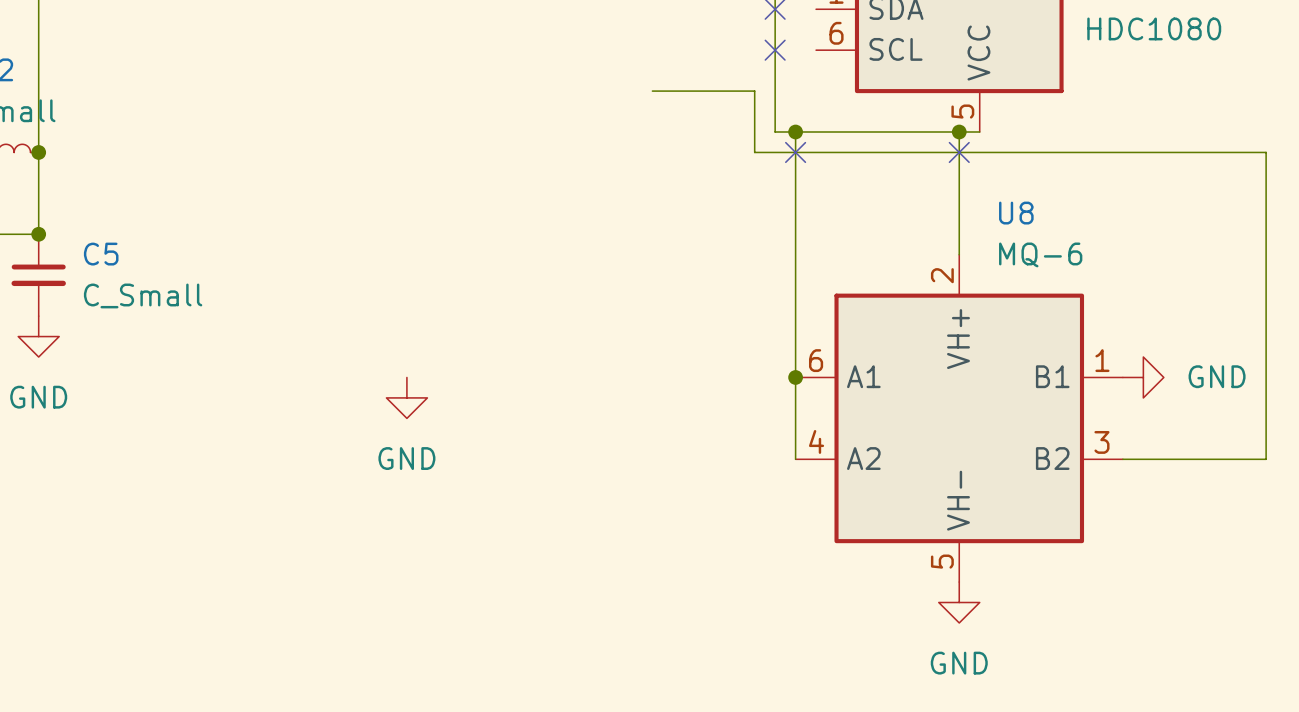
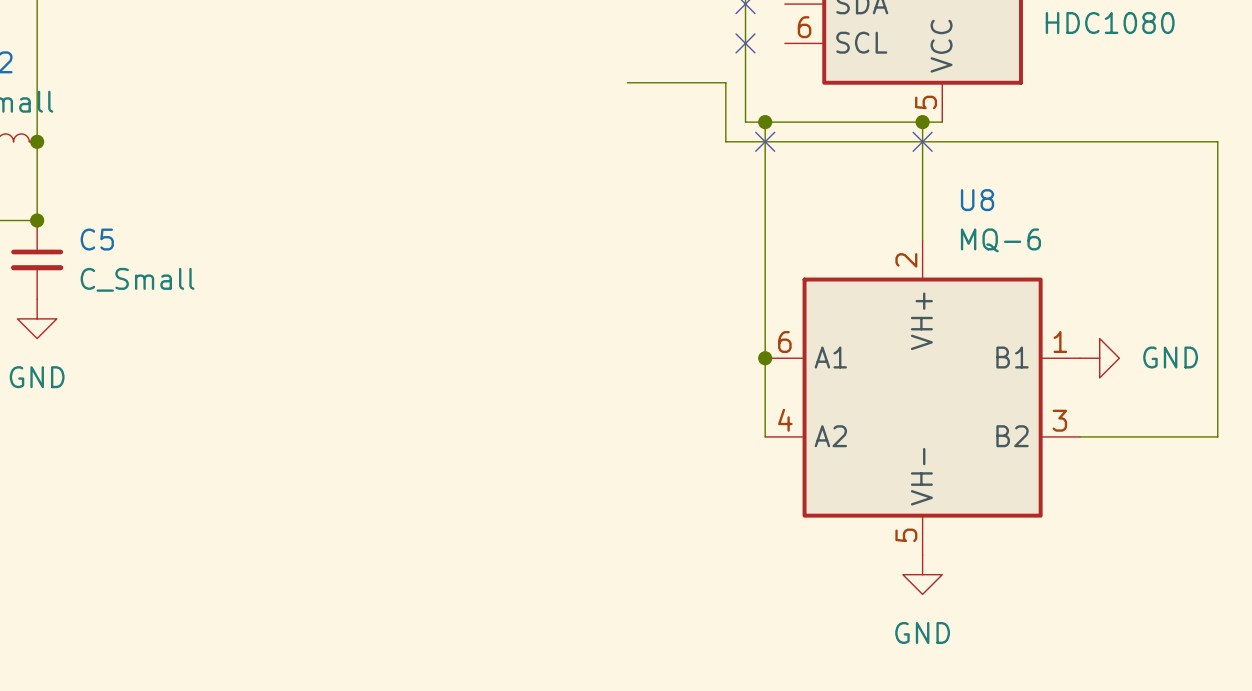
power symbol: GND (406, 397) -> none

